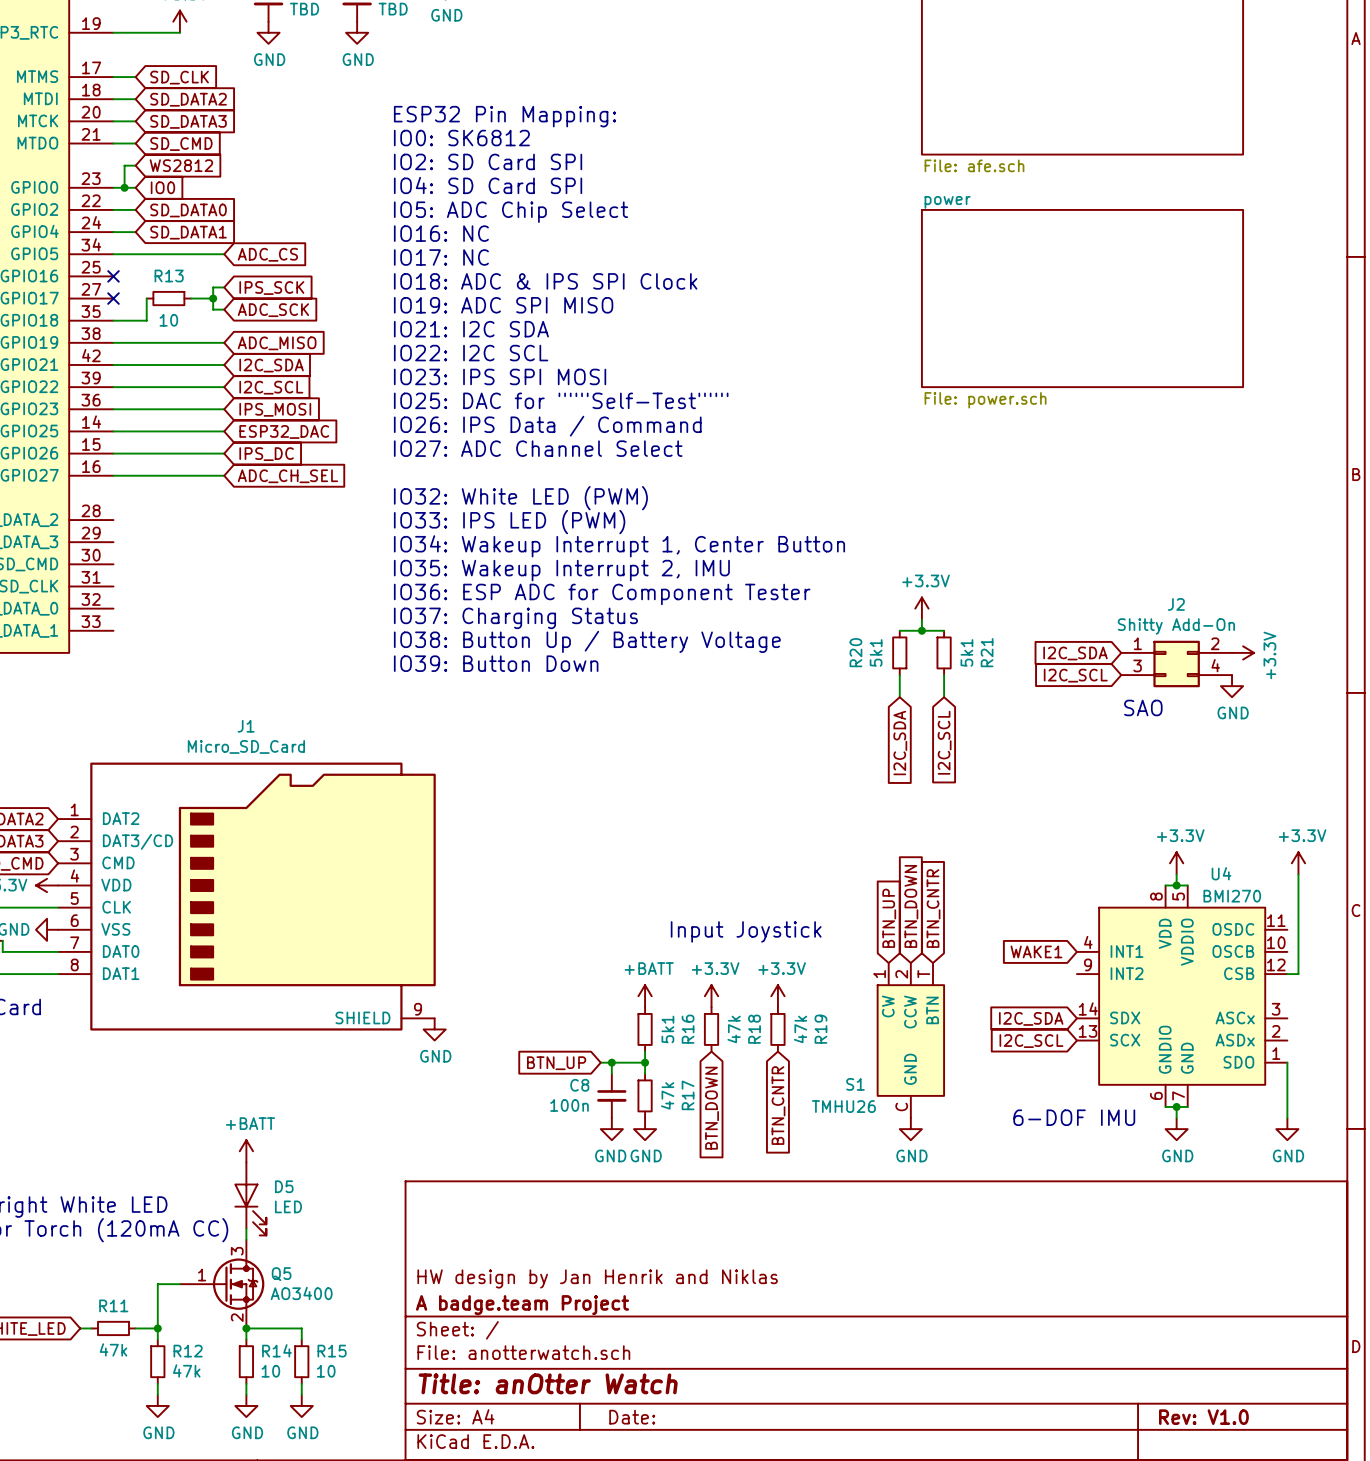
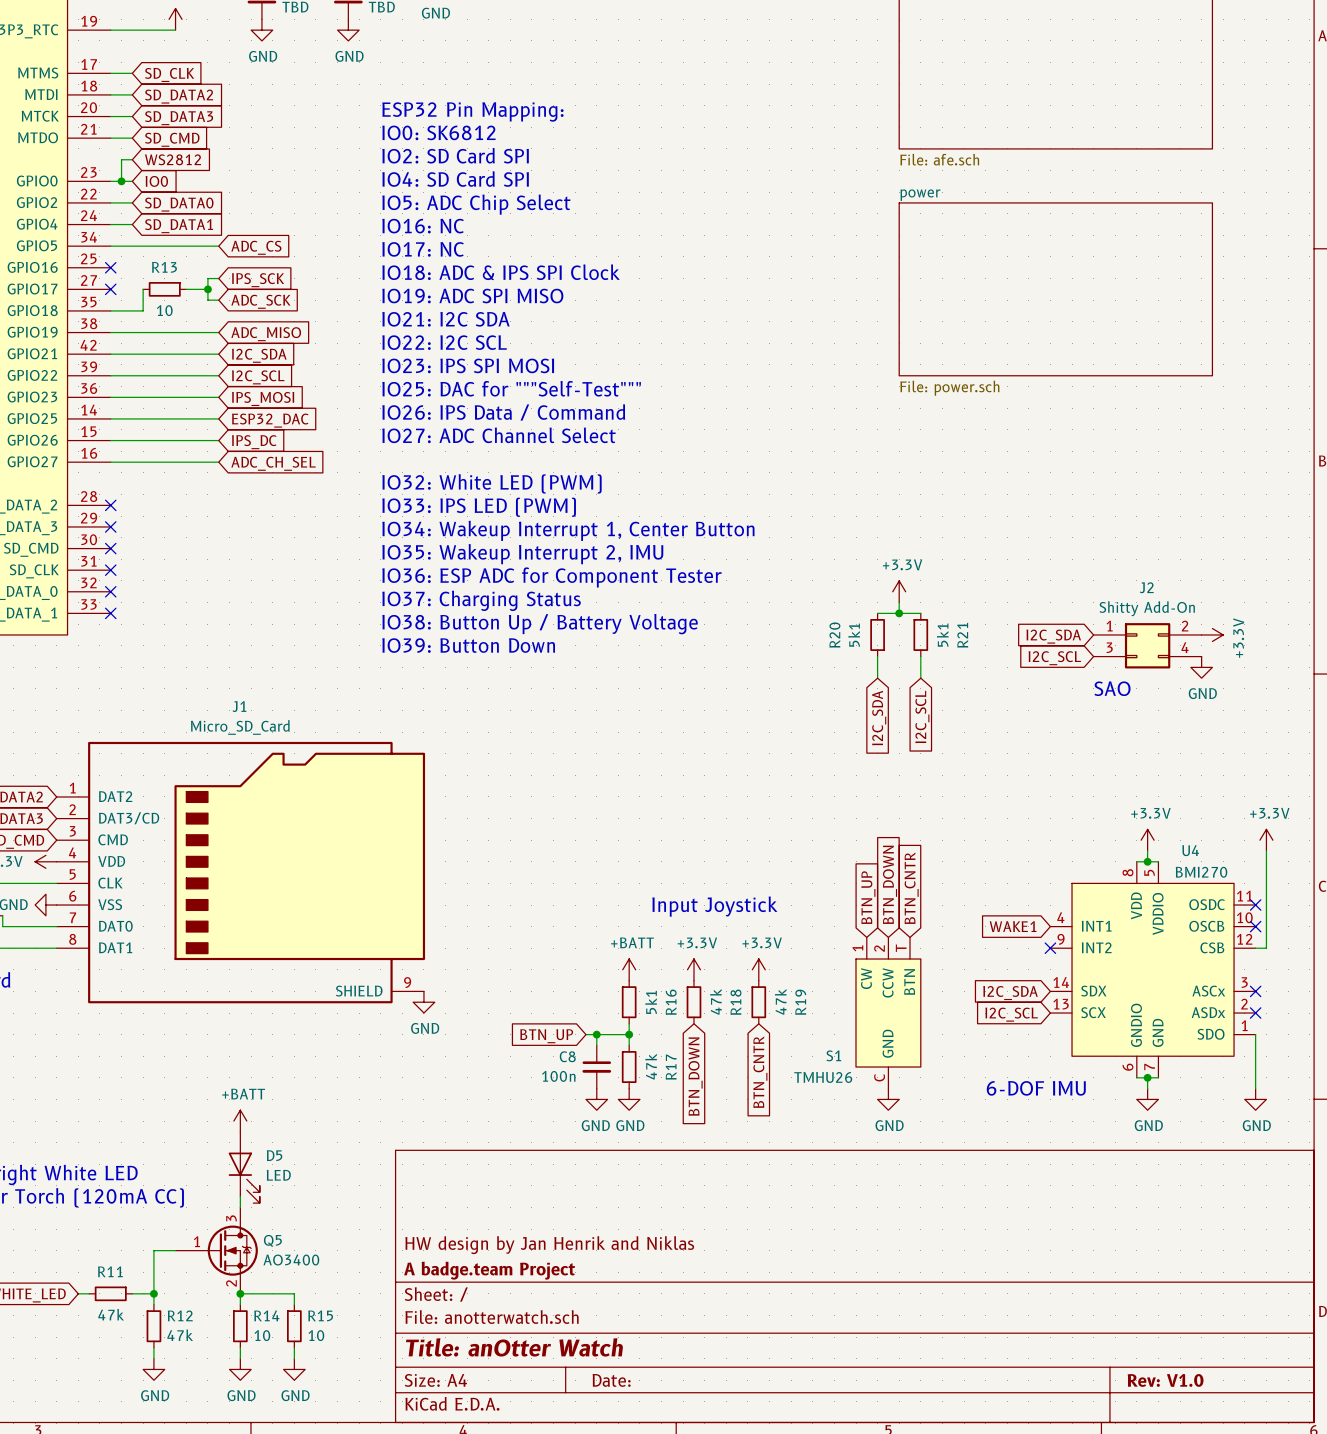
no-connect mark: none -> (110, 505)
no-connect mark: none -> (110, 526)
no-connect mark: none -> (110, 548)
no-connect mark: none -> (110, 570)
no-connect mark: none -> (110, 591)
no-connect mark: none -> (110, 613)
no-connect mark: none -> (1255, 905)
no-connect mark: none -> (1255, 926)
no-connect mark: none -> (1050, 948)
no-connect mark: none -> (1255, 991)
no-connect mark: none -> (1255, 1013)

